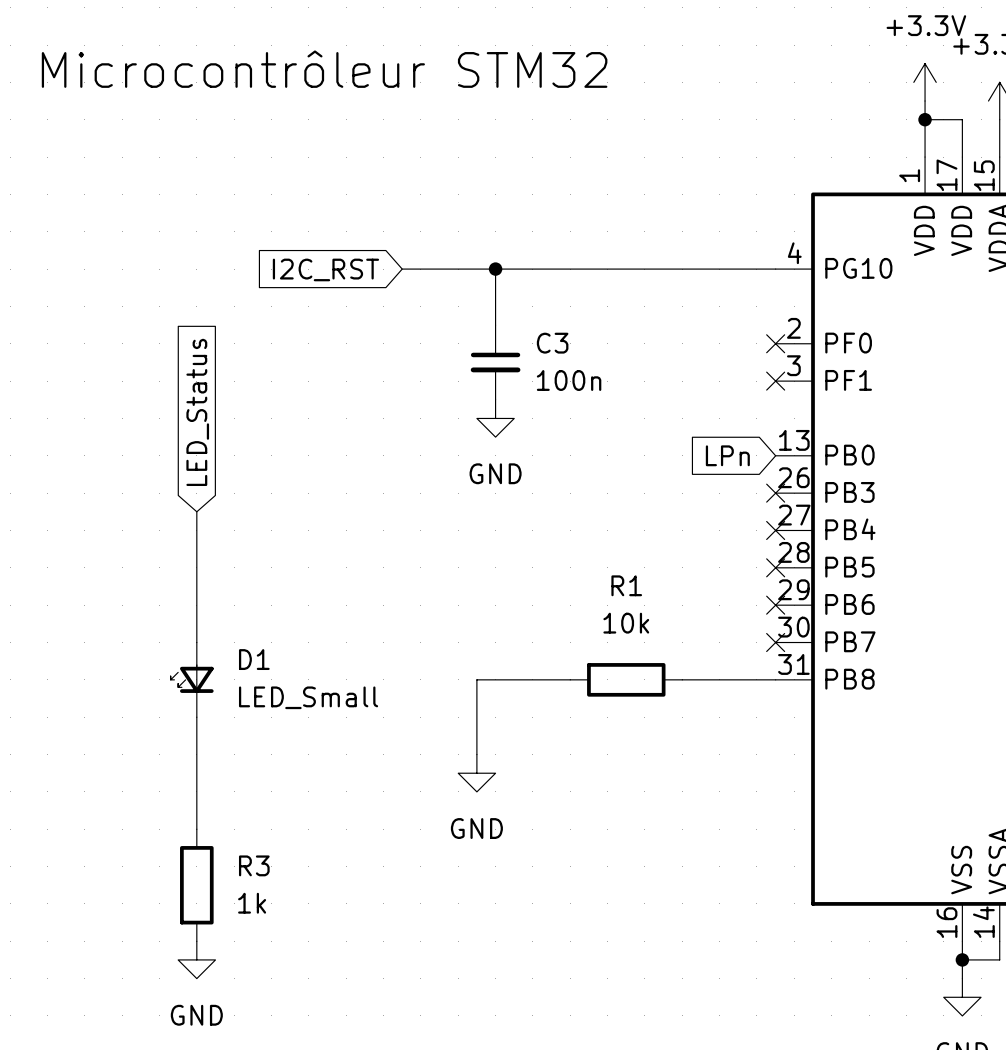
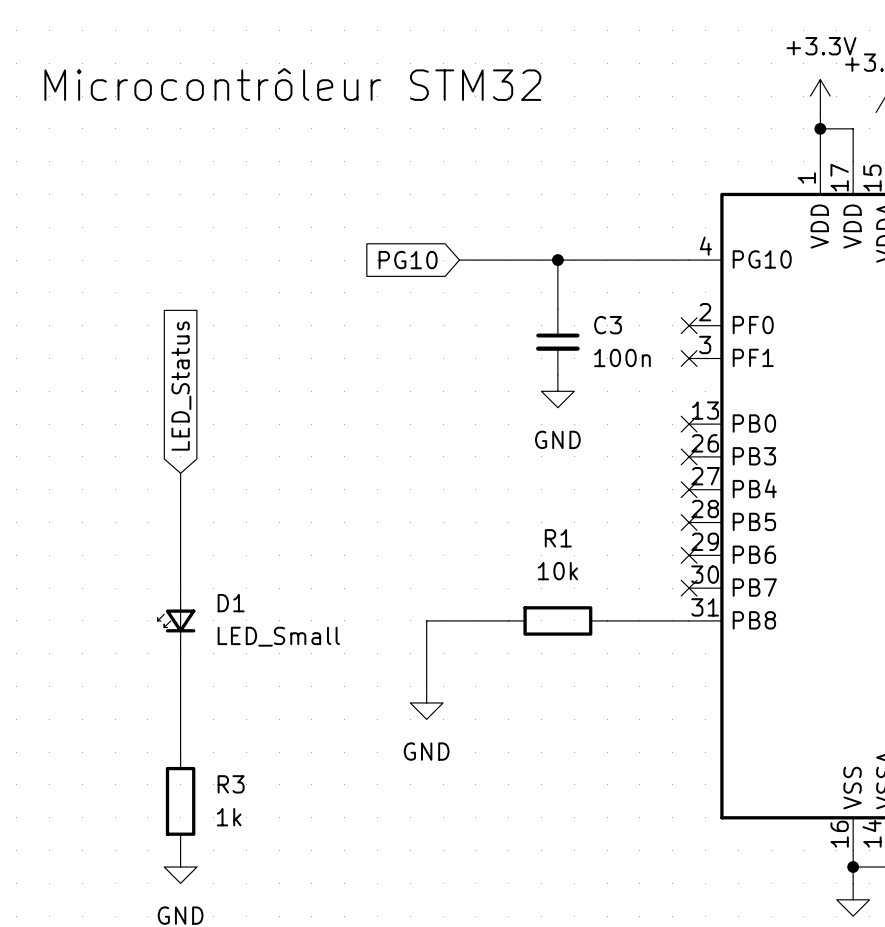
global label: I2C_RST (325, 269) -> none
wire: (402, 269) (514, 269) -> none
global label: none -> PG10 (408, 260)
wire: (495, 269) (495, 325) -> (557, 260) (557, 309)
junction: (495, 269) -> none
junction: none -> (557, 260)
C3 position: (495, 362) -> (557, 342)
power symbol position: GND (495, 418) -> GND (557, 391)
global label: LPn (727, 455) -> none
no-connect mark: none -> (689, 424)

